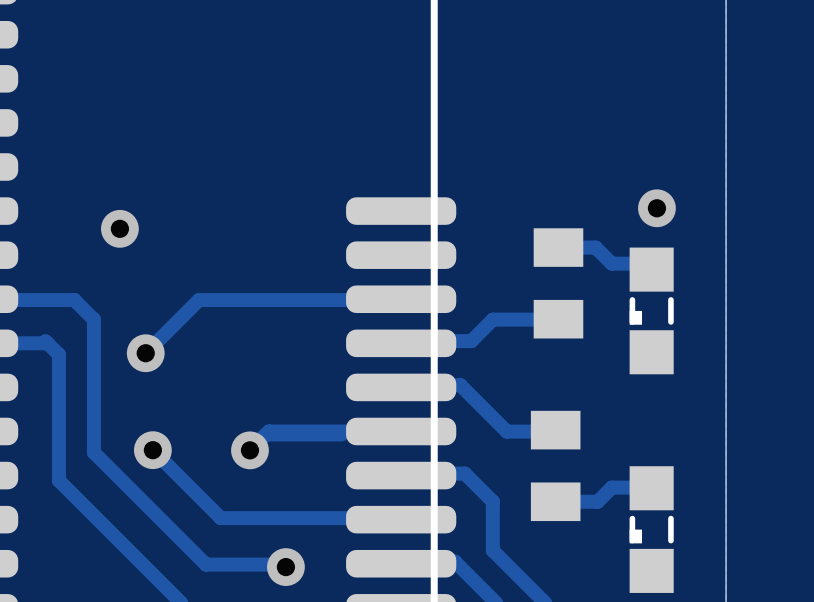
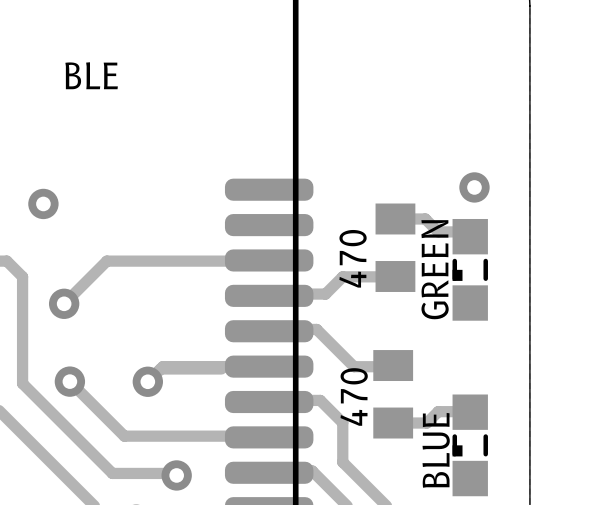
text: none -> BLE (91, 75)
text: none -> 470 (353, 258)
text: none -> GREEN (435, 269)
text: none -> 470 (354, 396)
text: none -> BLUE (436, 450)

